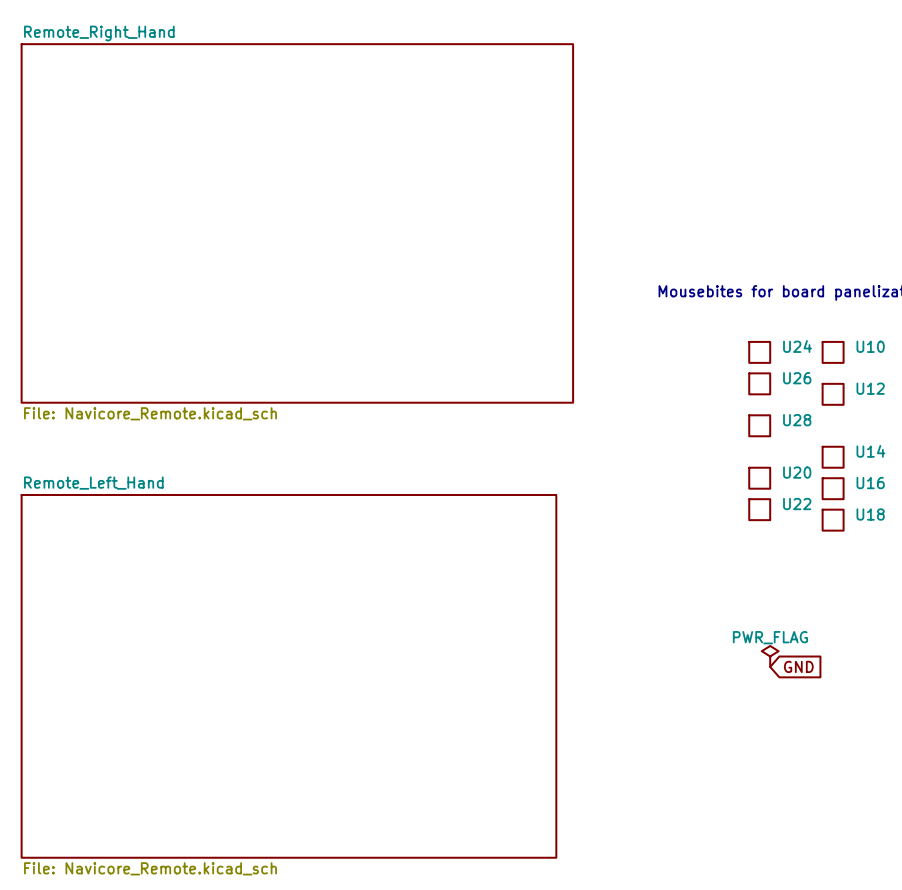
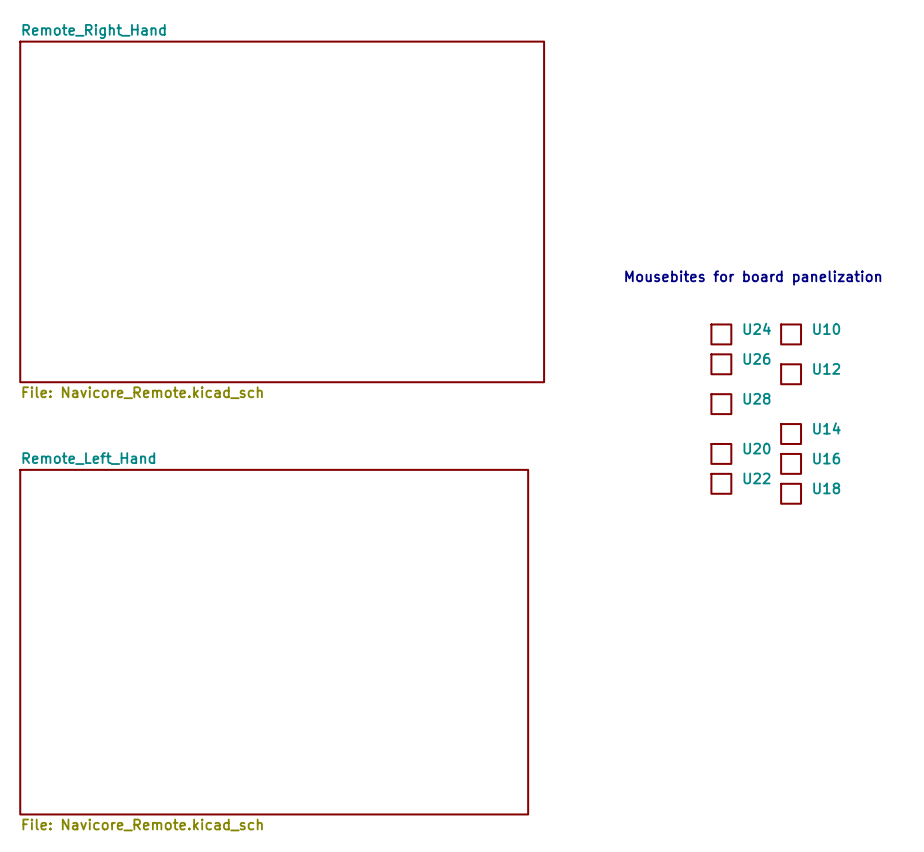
power symbol: PWR_FLAG (770, 656) -> none
global label: GND (798, 666) -> none

